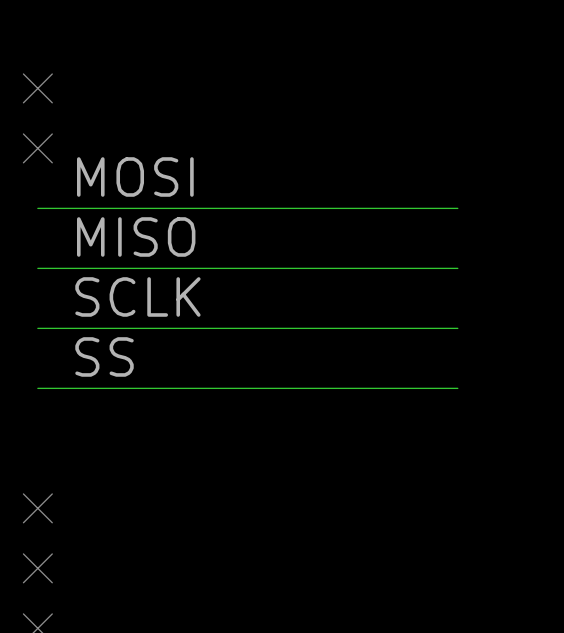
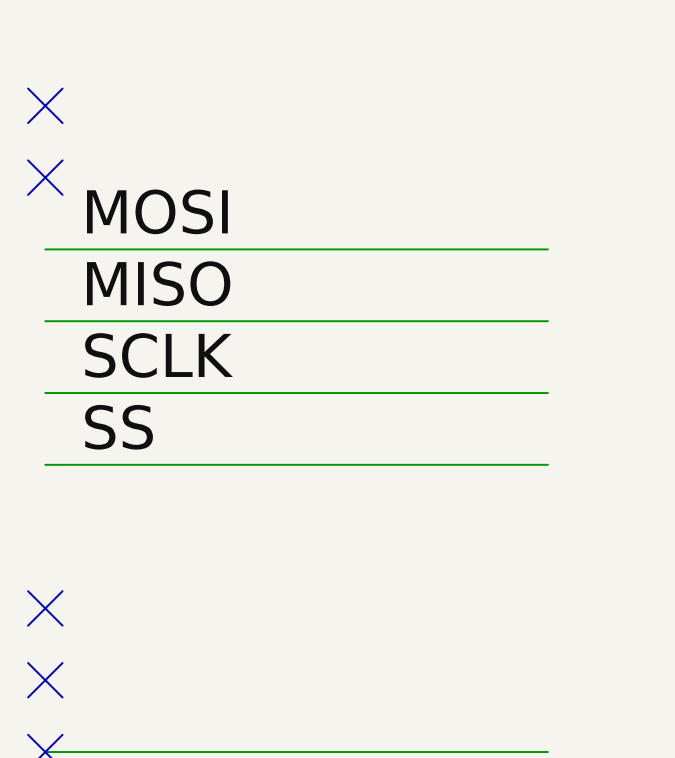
wire: none -> (45, 752) (547, 752)

